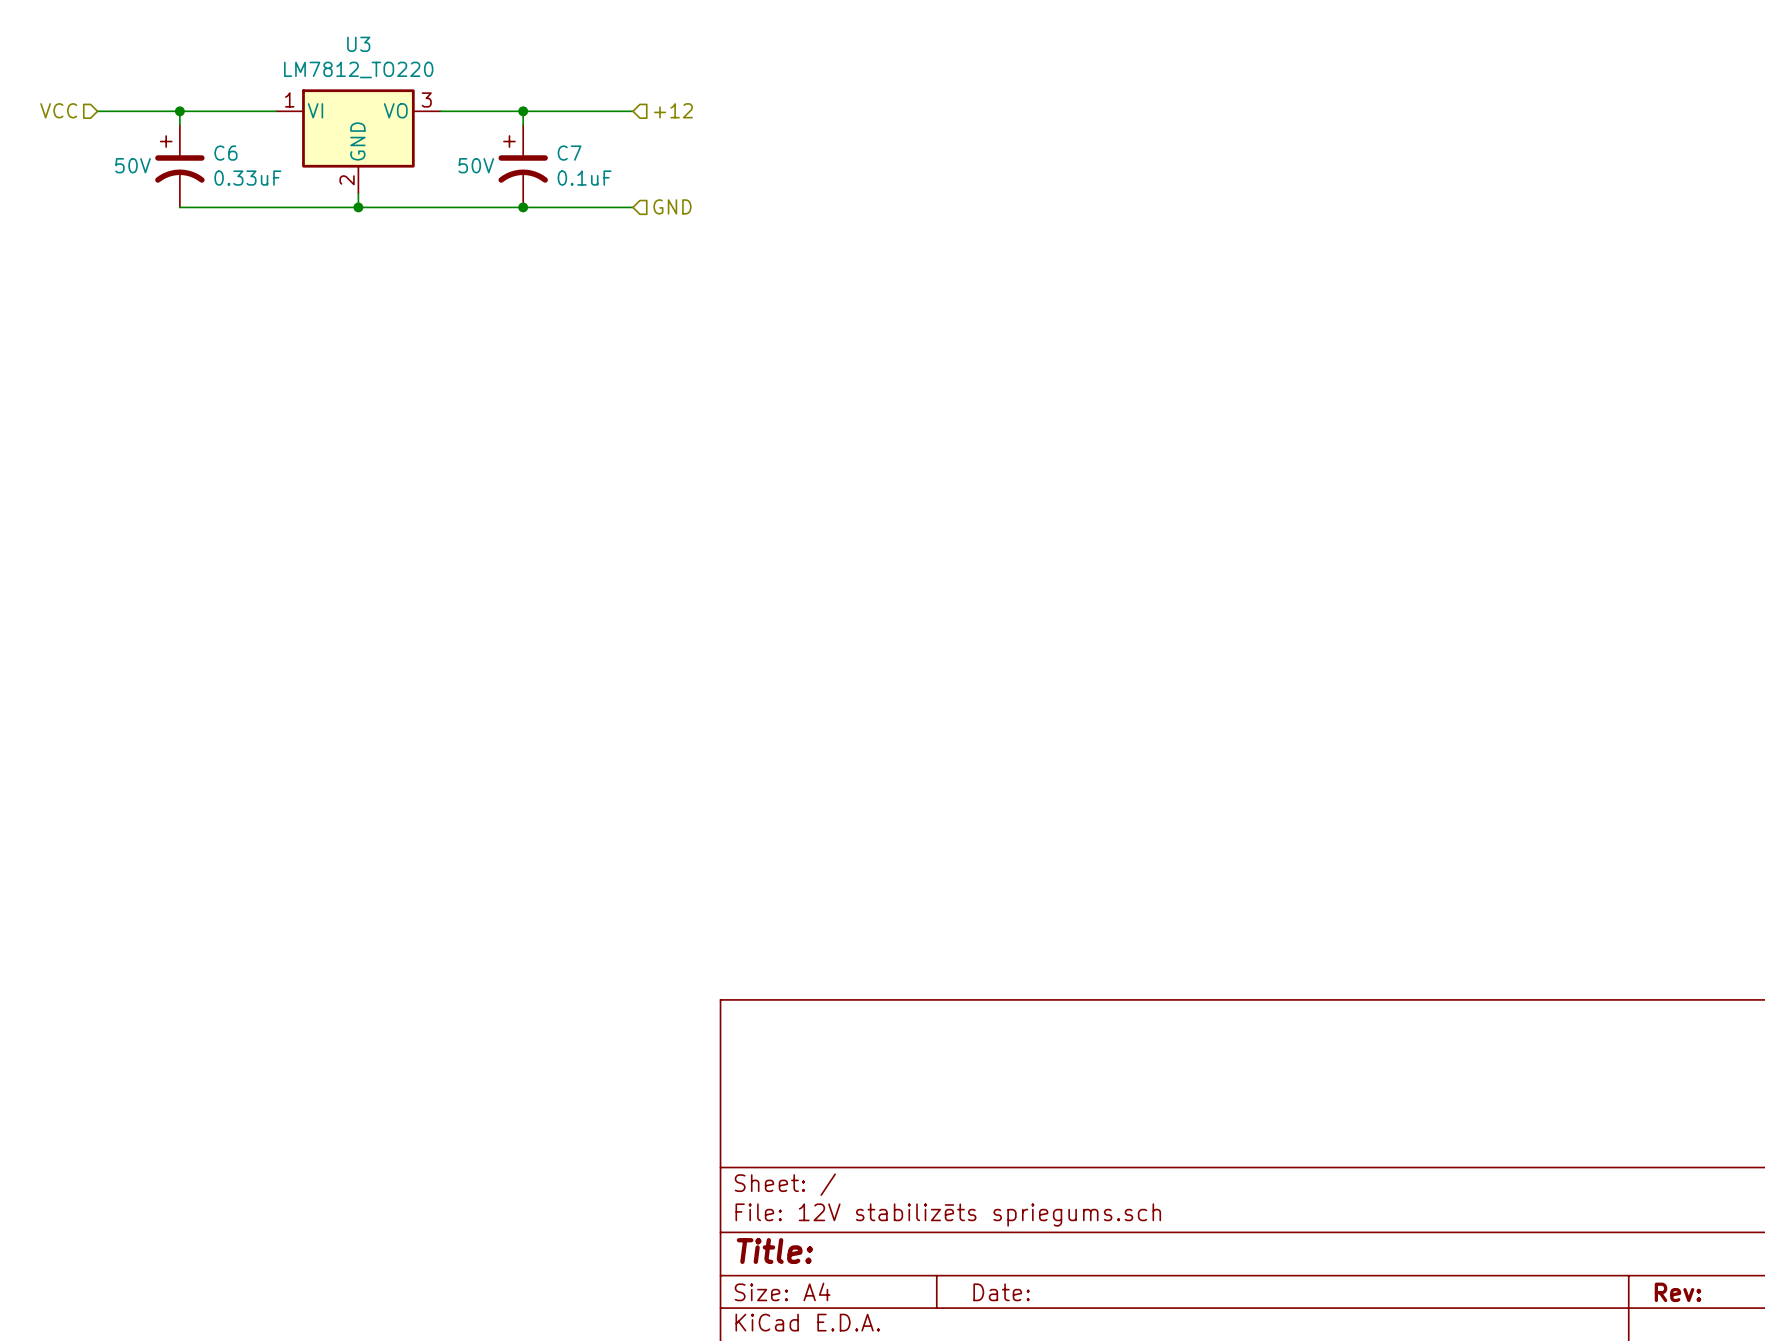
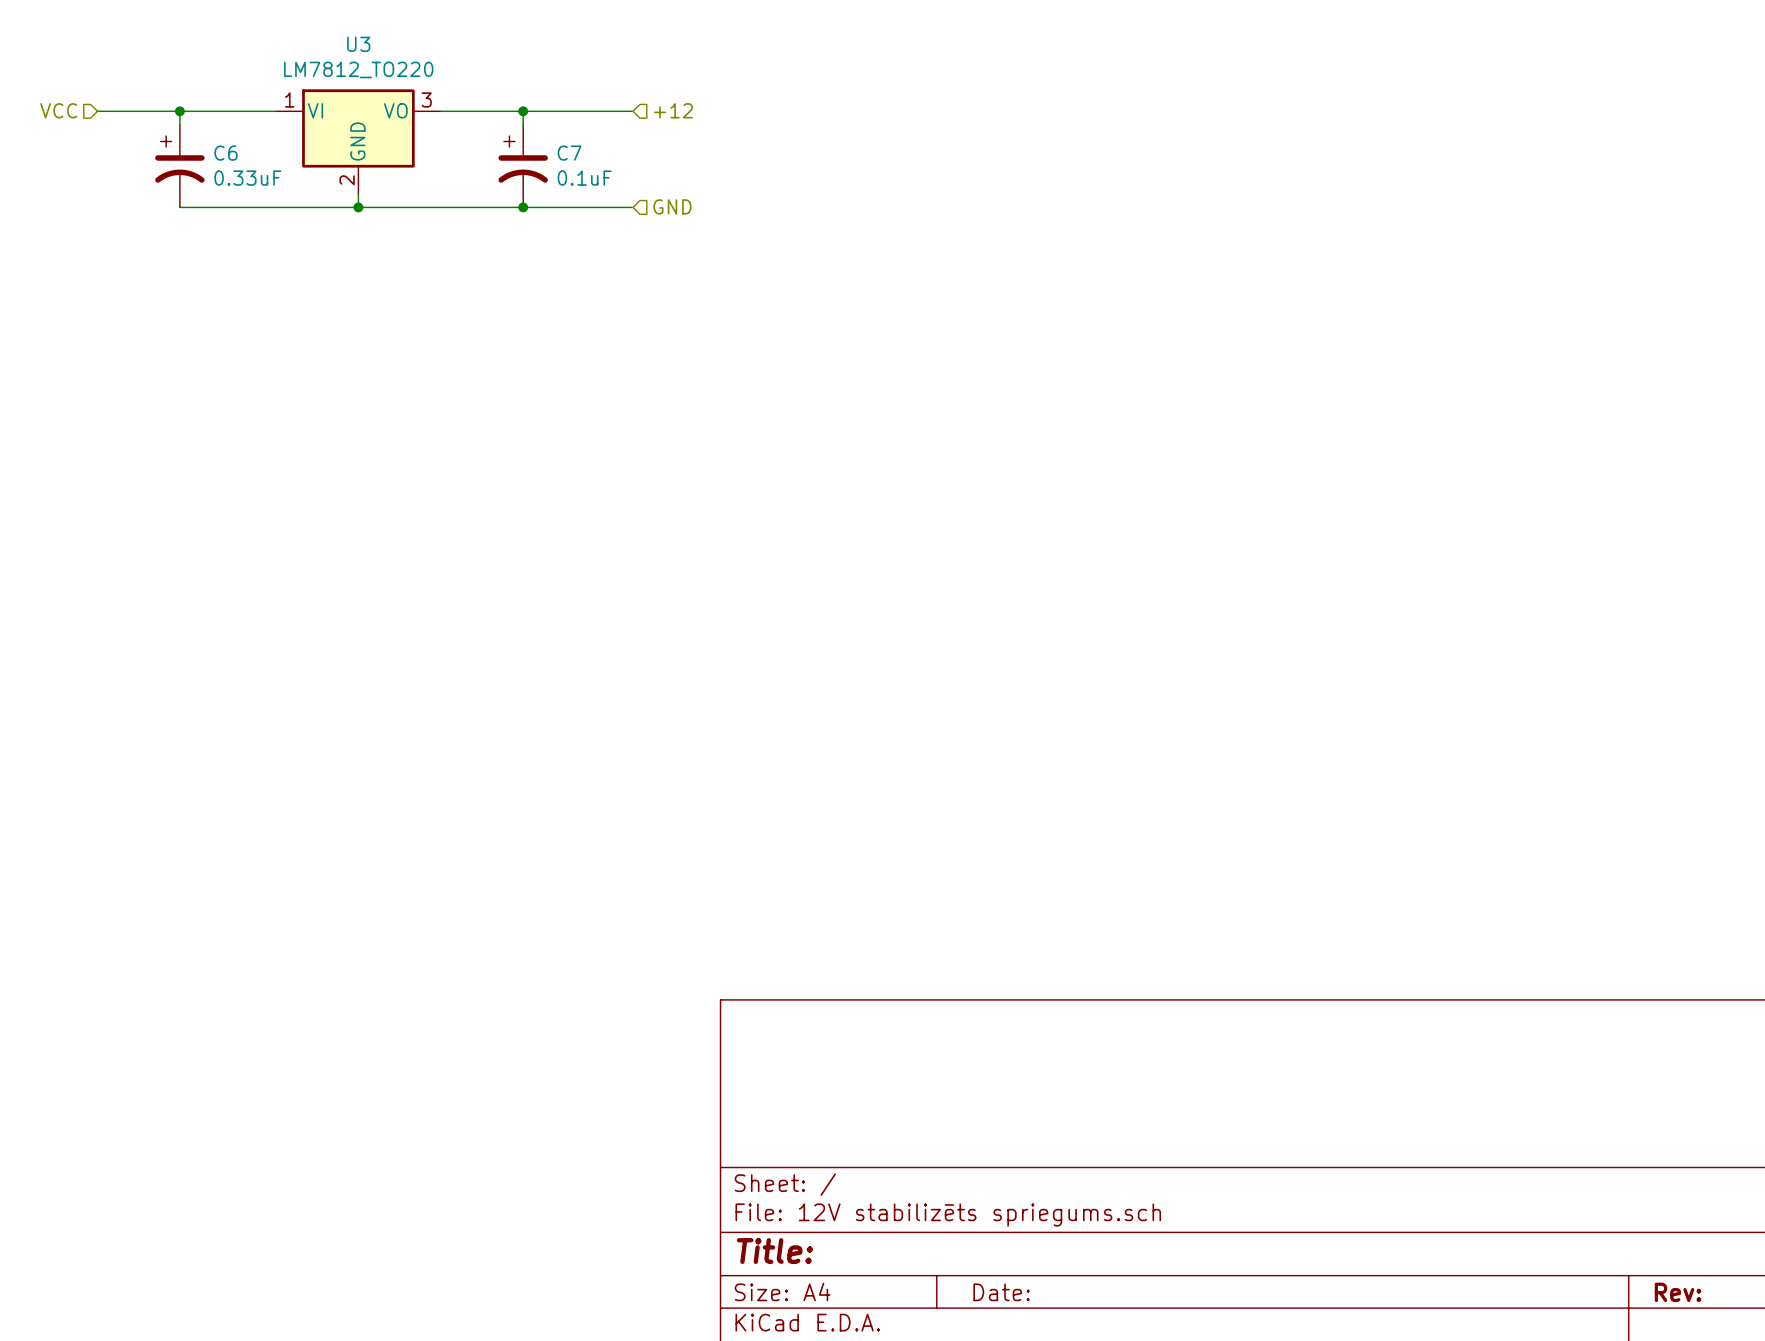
C6 text: 50V (133, 165) -> none
C7 text: 50V (476, 165) -> none

